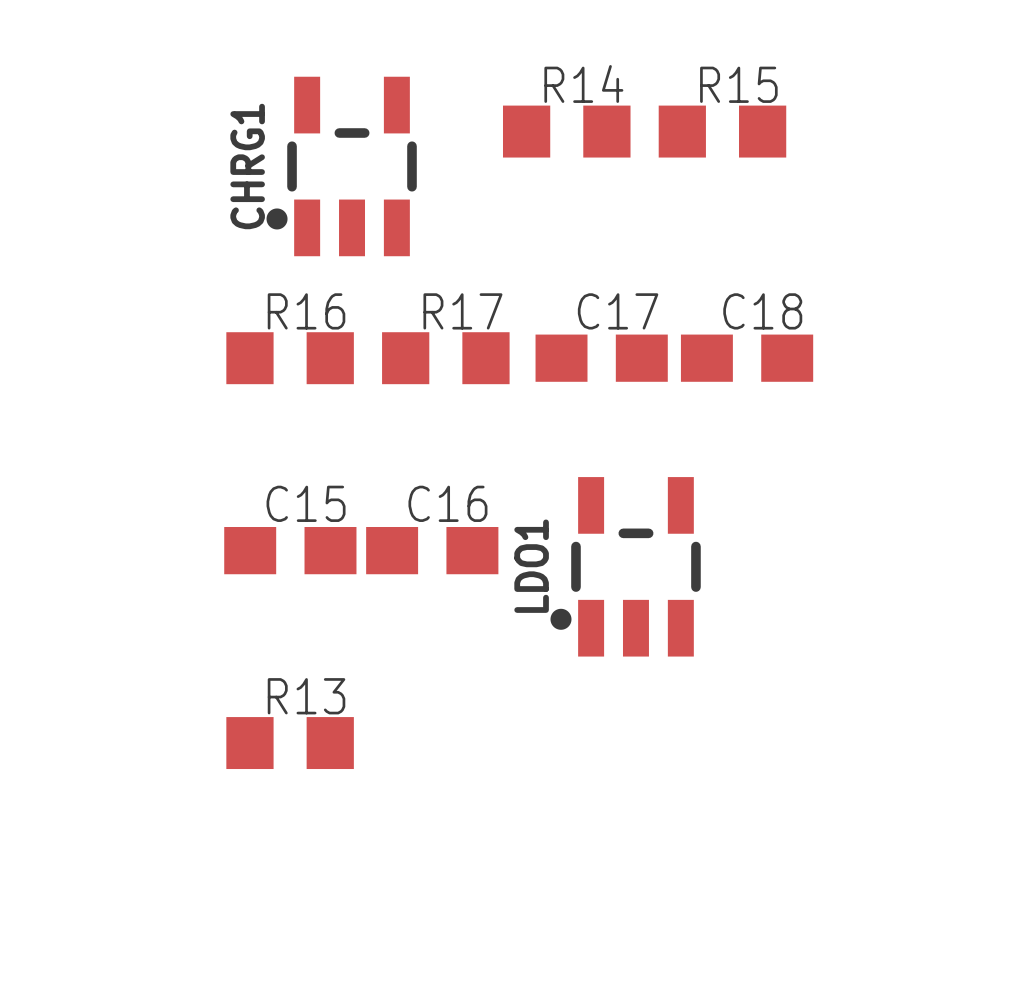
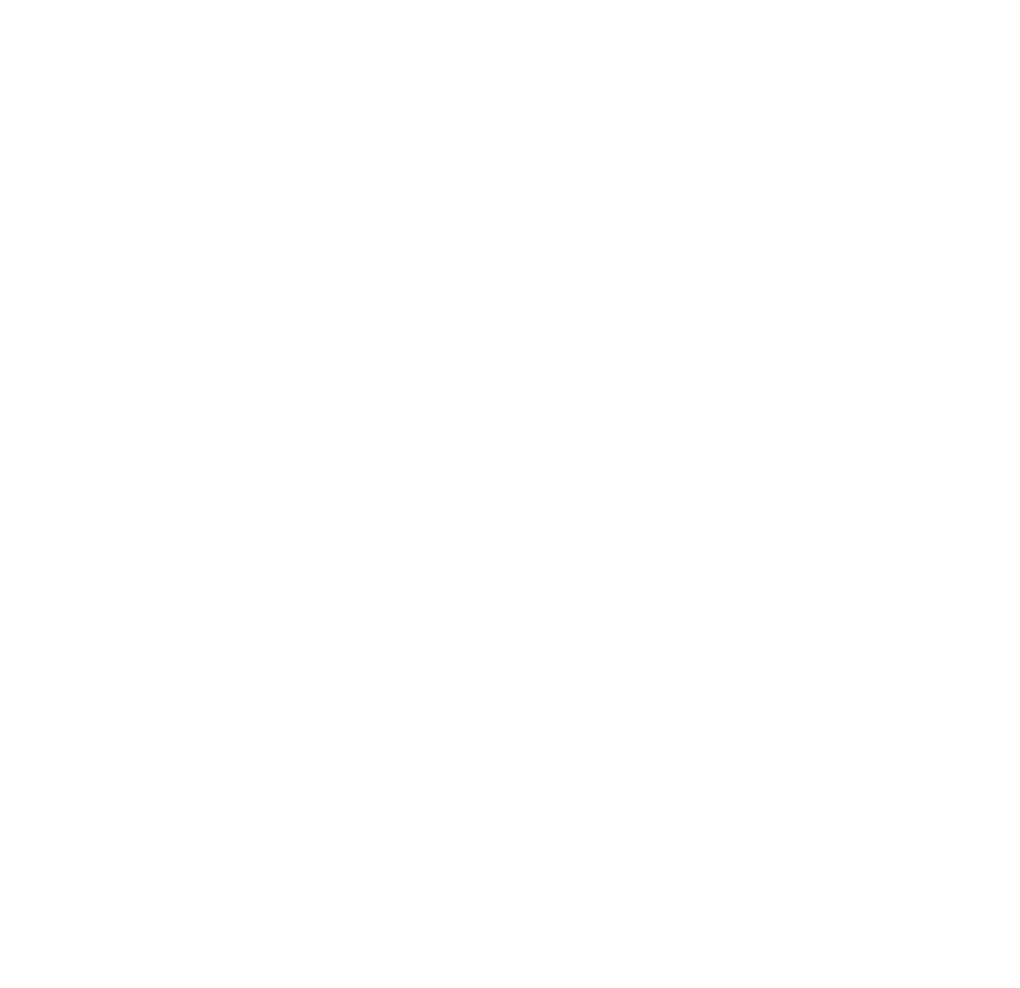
R14: (566, 131) -> none
R15: (722, 131) -> none
CHRG1: (341, 166) -> none
R16: (290, 358) -> none
R17: (445, 358) -> none
C17: (601, 358) -> none
C18: (747, 358) -> none
C15: (290, 550) -> none
C16: (432, 550) -> none
LDO1: (625, 566) -> none
R13: (290, 743) -> none

